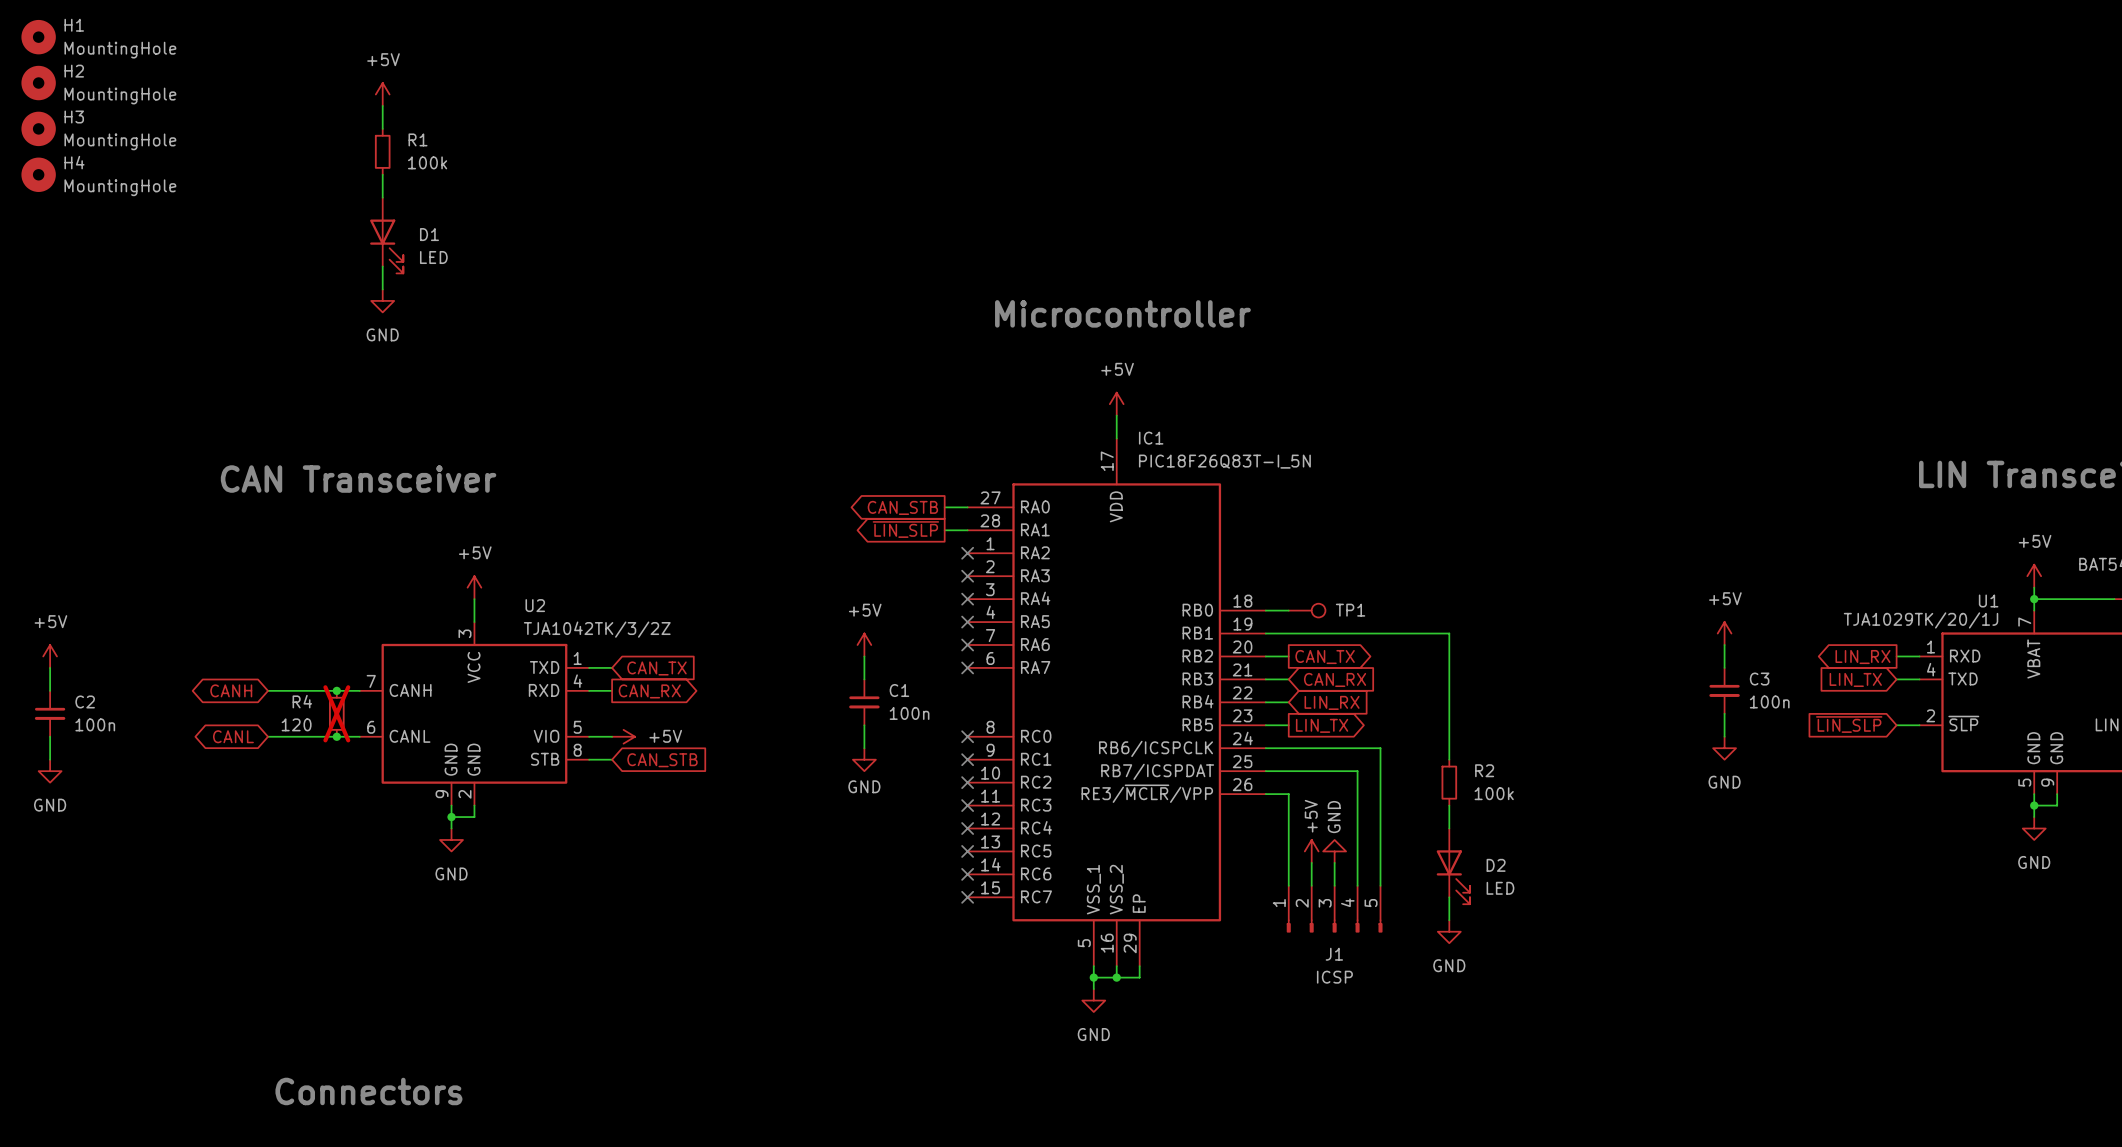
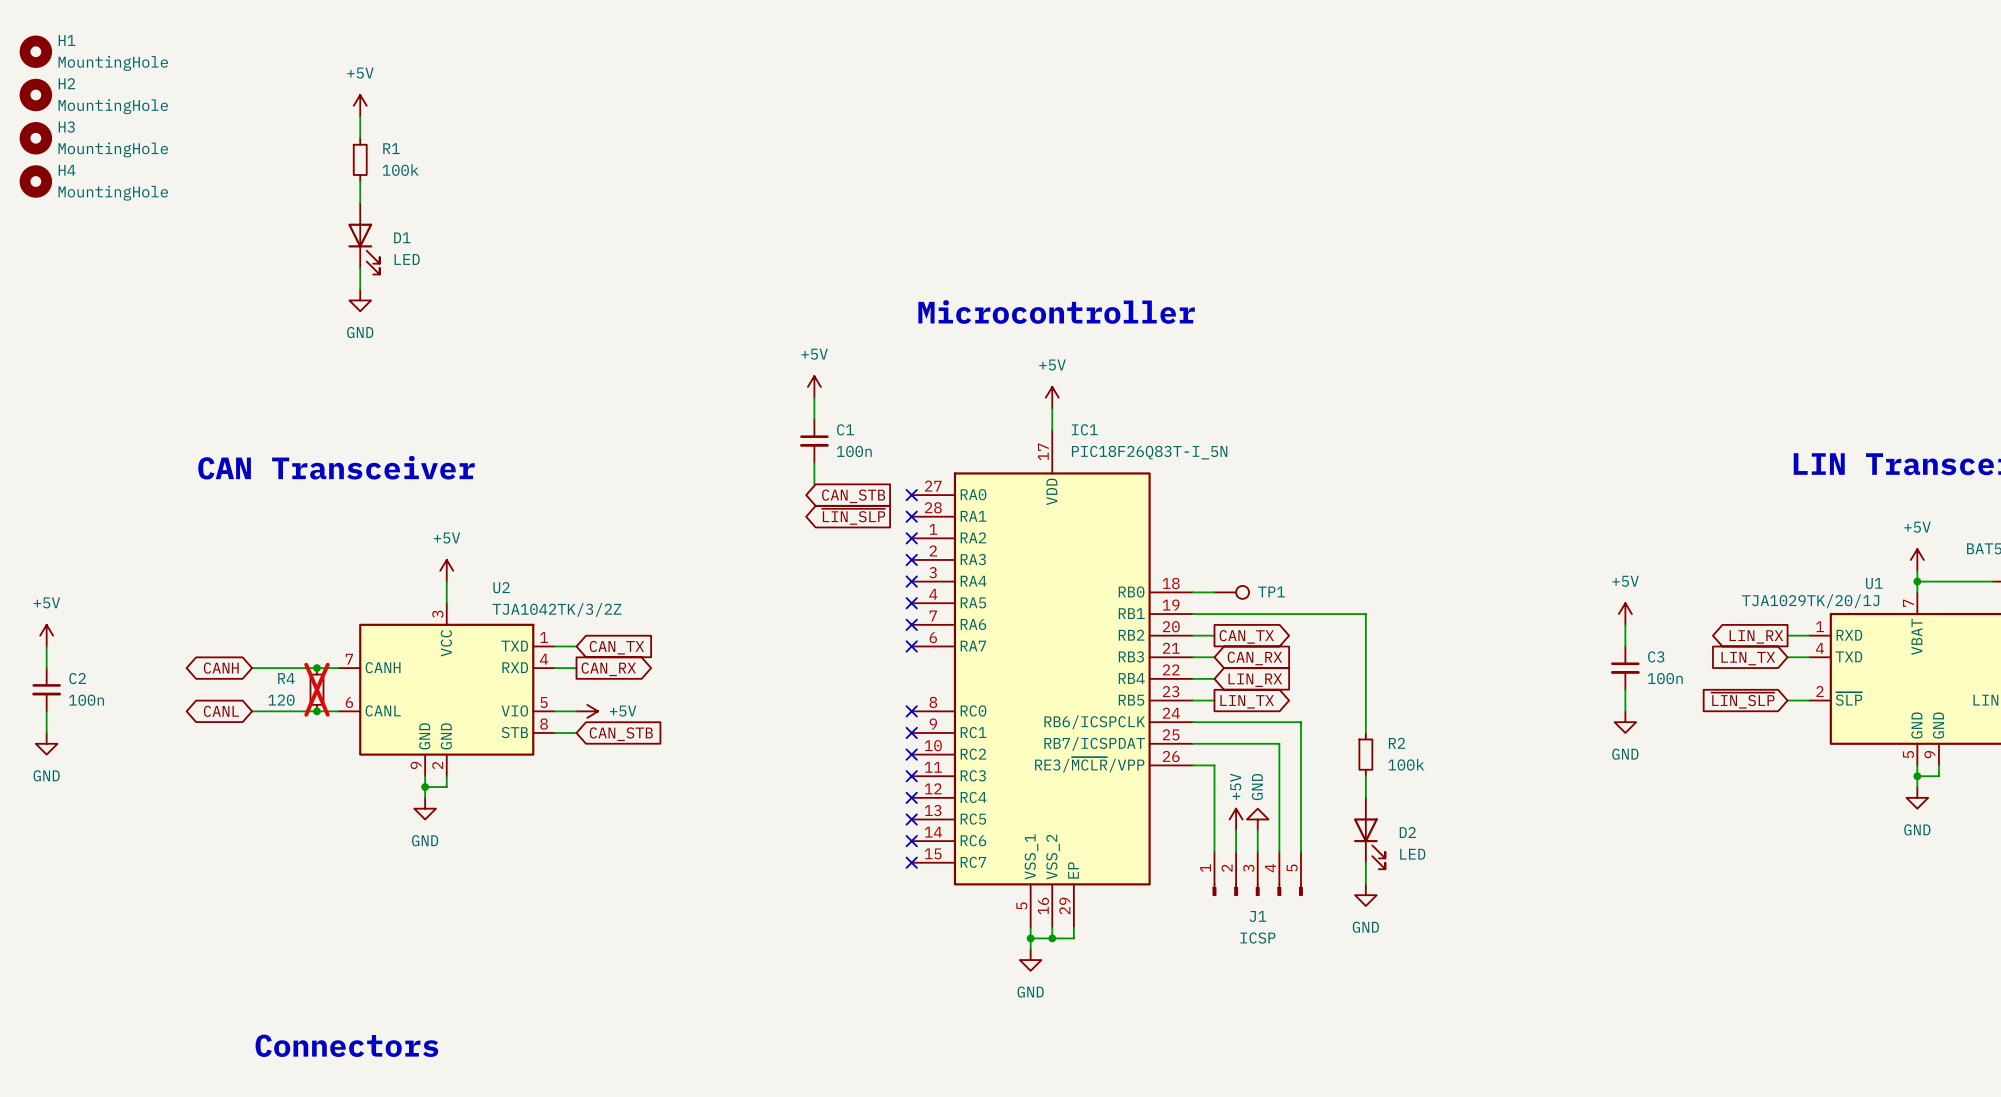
power symbol: none -> +5V (814, 386)
wire: none -> (814, 397) (814, 419)
wire: (944, 507) (967, 507) -> none
no-connect mark: none -> (911, 495)
wire: (944, 530) (967, 530) -> none
no-connect mark: none -> (911, 516)
power symbol: +5V (864, 645) -> none
wire: (864, 656) (864, 679) -> (814, 462) (814, 484)
C1 position: (864, 702) -> (814, 441)
wire: (864, 725) (864, 748) -> none
power symbol: GND (864, 759) -> none

